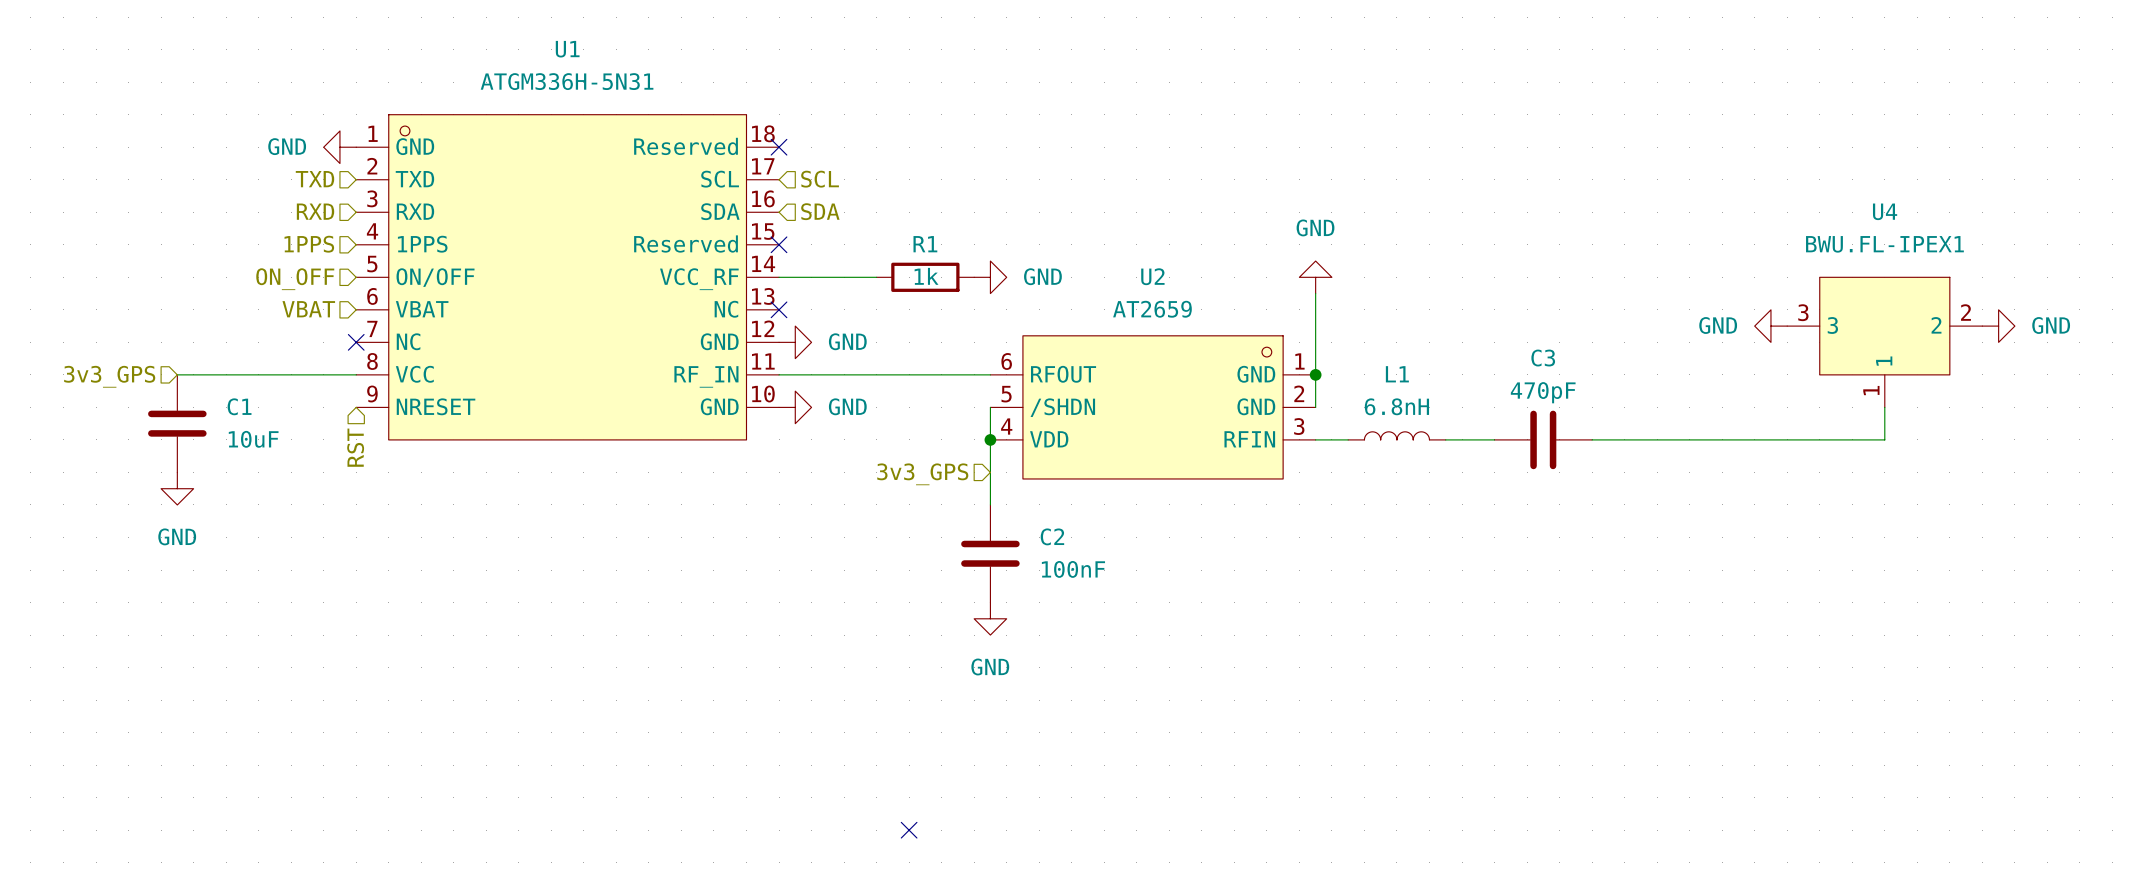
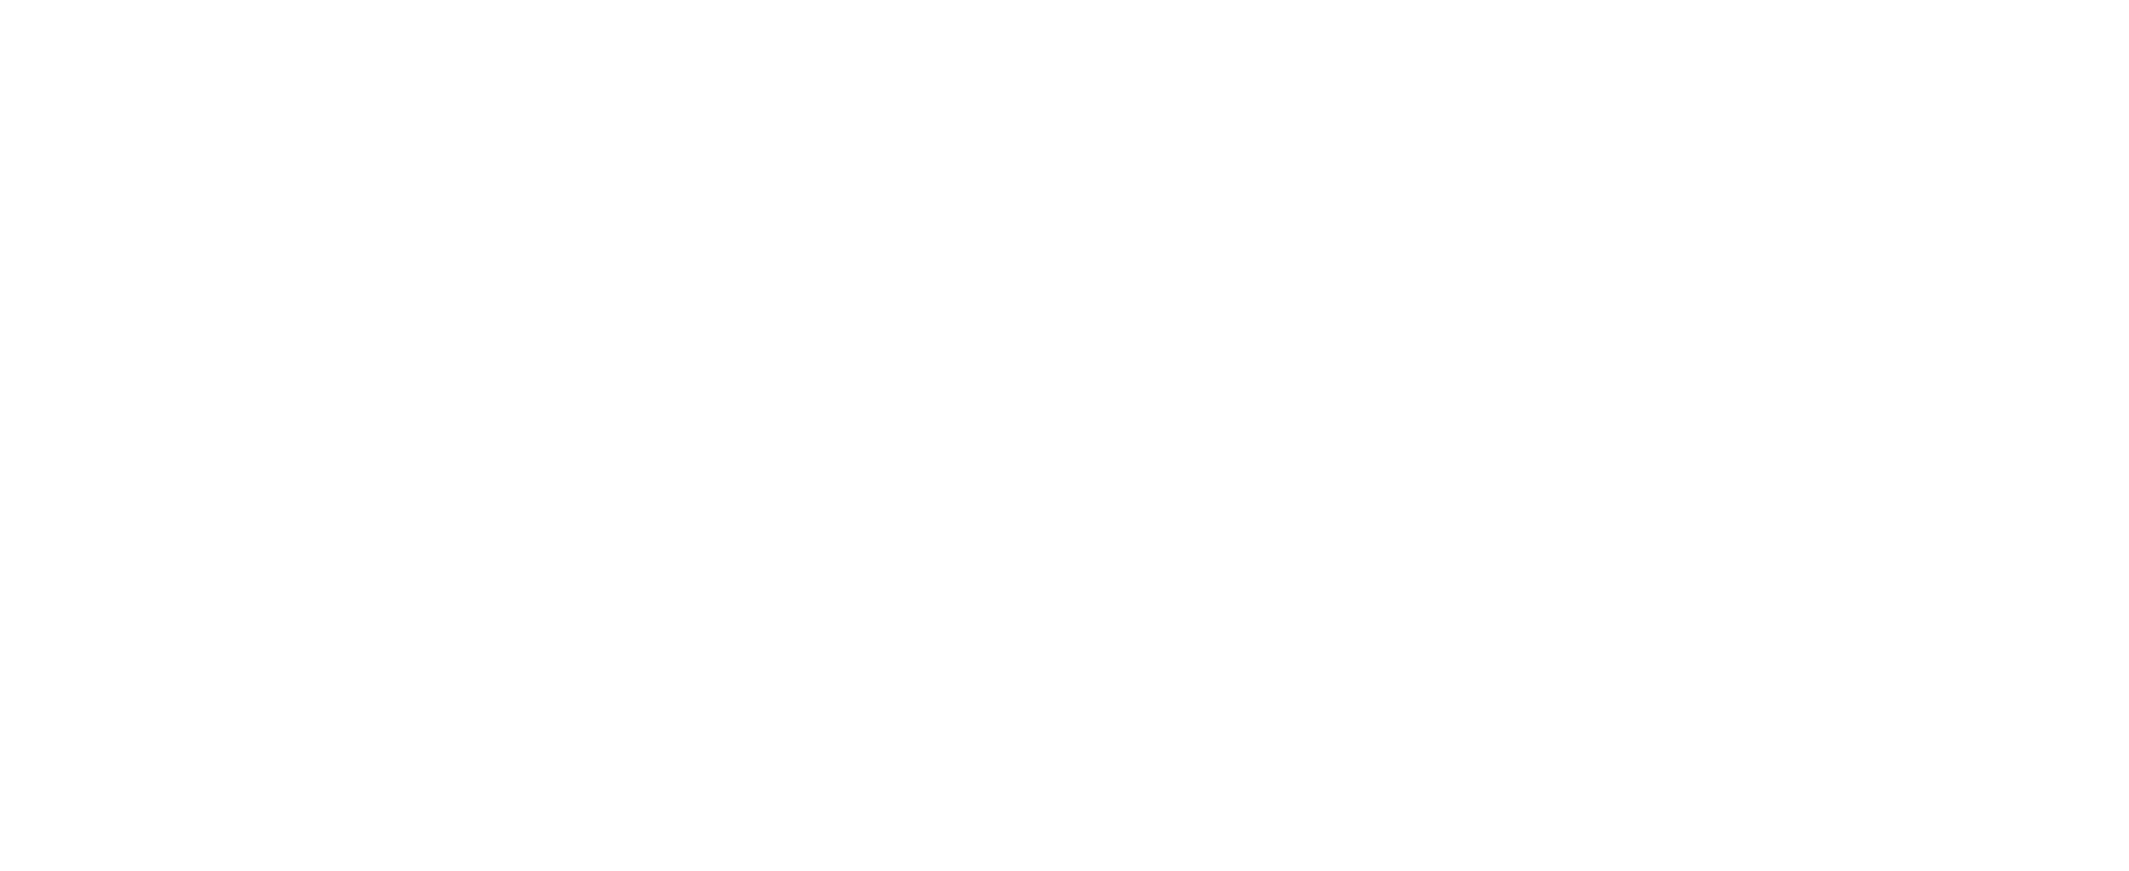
power symbol: GND (339, 147) -> none
no-connect mark: (779, 147) -> none
hierarchical label: TXD (314, 179) -> none
hierarchical label: SCL (820, 179) -> none
hierarchical label: RXD (315, 211) -> none
hierarchical label: SDA (820, 211) -> none
hierarchical label: 1PPS (309, 244) -> none
no-connect mark: (779, 244) -> none
U1: ATGM336H-5N31 (567, 277) -> none
wire: (779, 277) (876, 277) -> none
R1: 1k (925, 277) -> none
power symbol: GND (990, 277) -> none
power symbol: GND (1315, 277) -> none
hierarchical label: ON_OFF (295, 279) -> none
wire: (1315, 293) (1315, 407) -> none
hierarchical label: VBAT (308, 309) -> none
no-connect mark: (779, 309) -> none
power symbol: GND (1770, 326) -> none
power symbol: GND (1998, 326) -> none
no-connect mark: (356, 342) -> none
power symbol: GND (795, 342) -> none
U4: BWU.FL-IPEX1 (1884, 342) -> none
wire: (177, 374) (356, 374) -> none
wire: (779, 374) (990, 374) -> none
junction: (1315, 374) -> none
hierarchical label: 3v3_GPS (109, 376) -> none
power symbol: GND (795, 407) -> none
wire: (990, 407) (990, 504) -> none
U2: AT2659 (1153, 407) -> none
wire: (1884, 407) (1884, 439) (1592, 439) -> none
C1: 10uF (177, 423) -> none
L1: 6.8nH (1396, 435) -> none
junction: (990, 439) -> none
wire: (1315, 439) (1348, 439) -> none
wire: (1445, 439) (1494, 439) -> none
C3: 470pF (1543, 439) -> none
hierarchical label: RST (355, 447) -> none
hierarchical label: 3v3_GPS (922, 474) -> none
power symbol: GND (177, 488) -> none
C2: 100nF (990, 553) -> none
power symbol: GND (990, 618) -> none
no-connect mark: (909, 830) -> none

